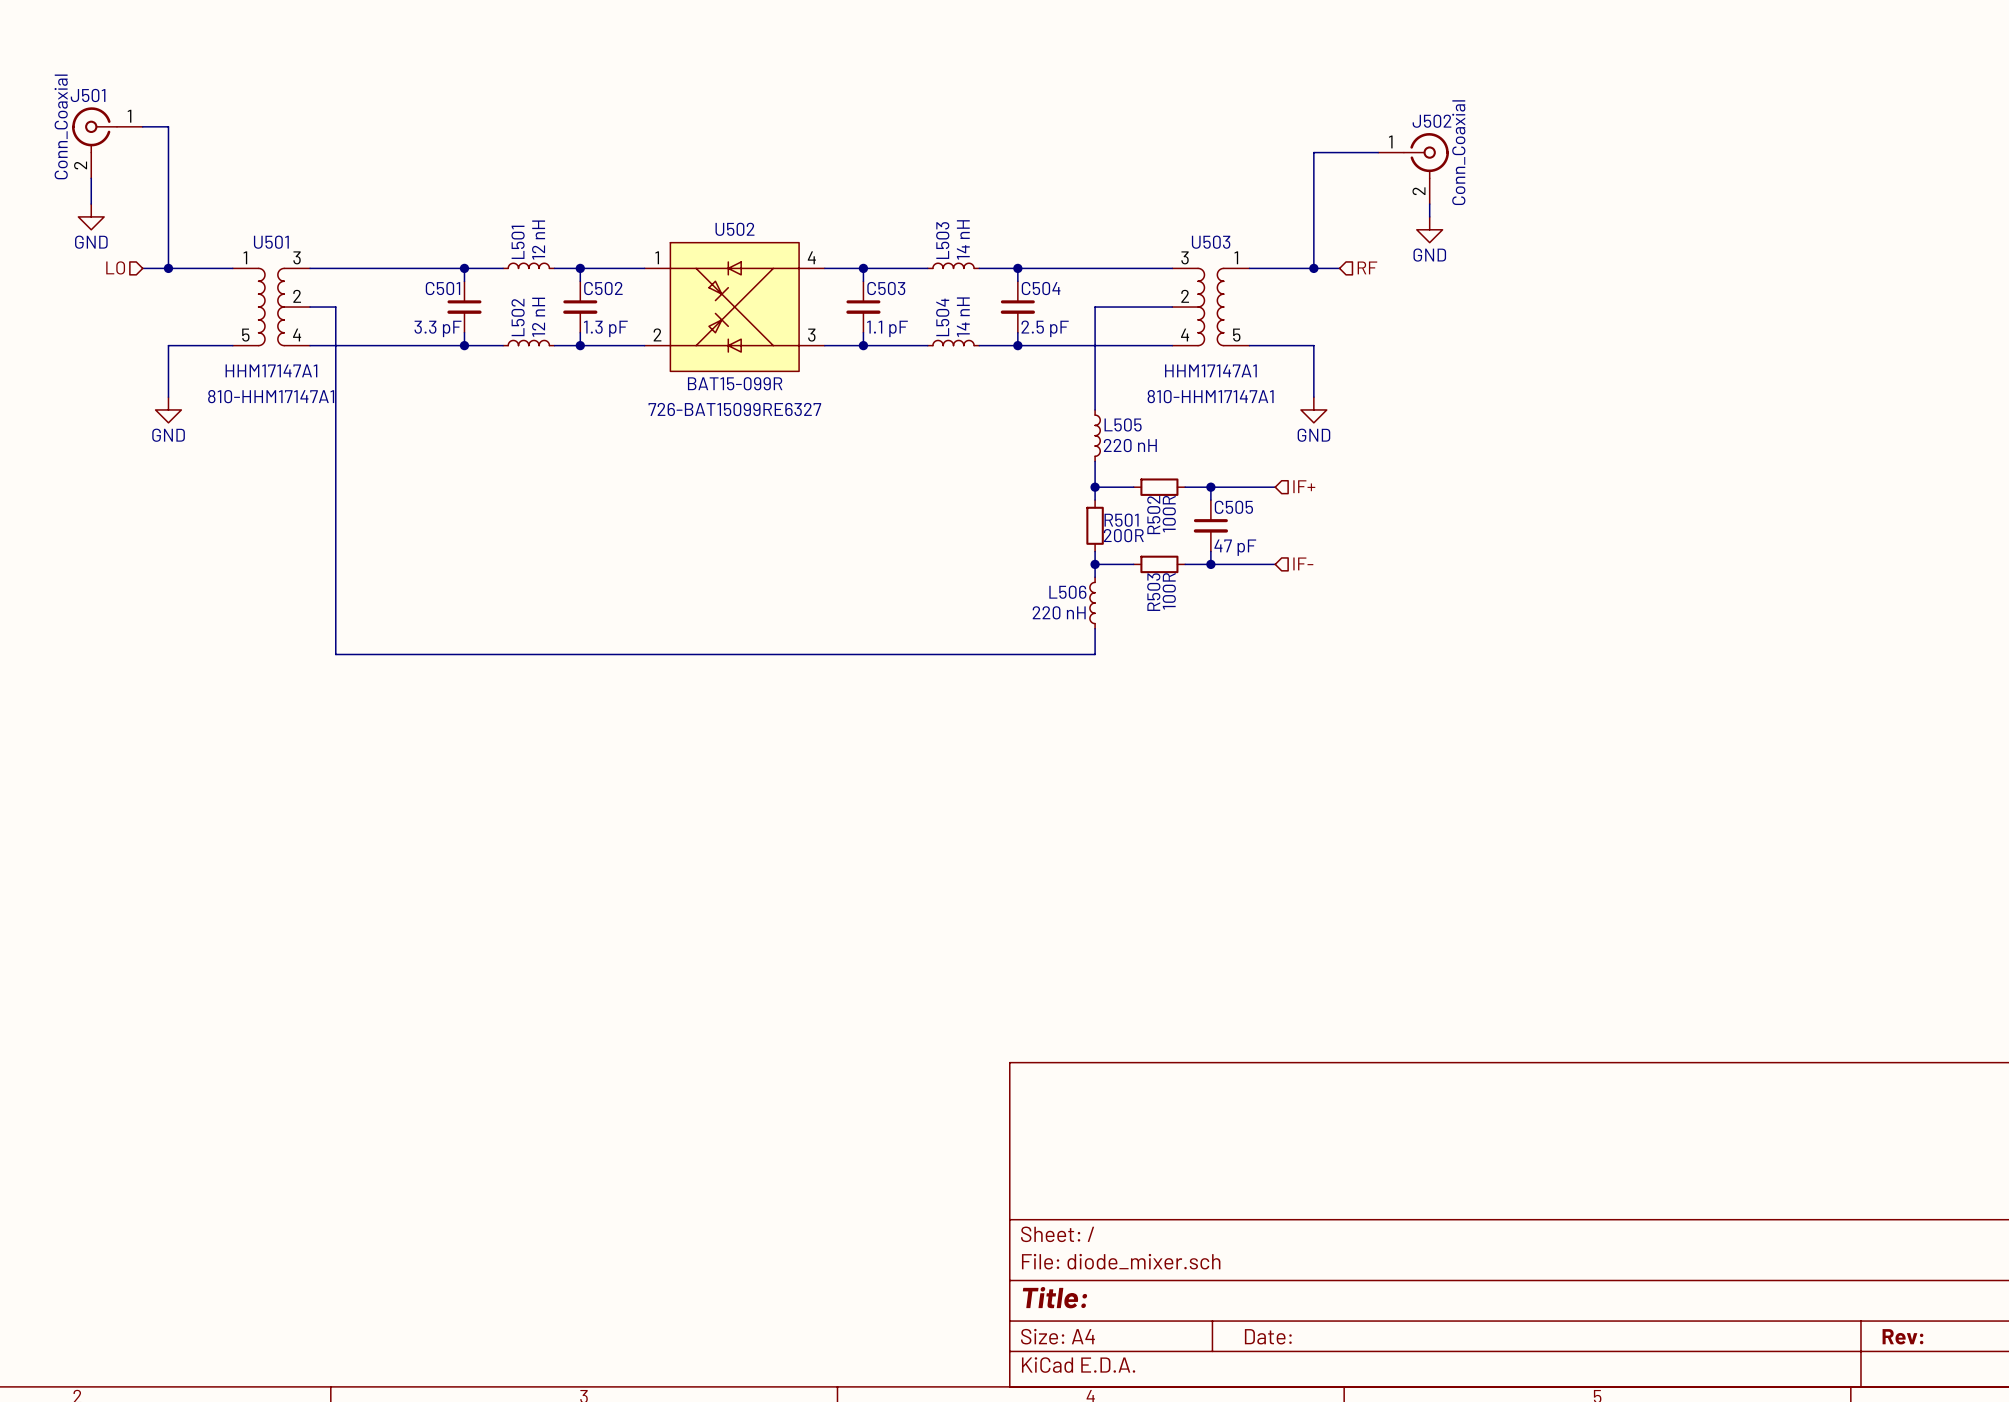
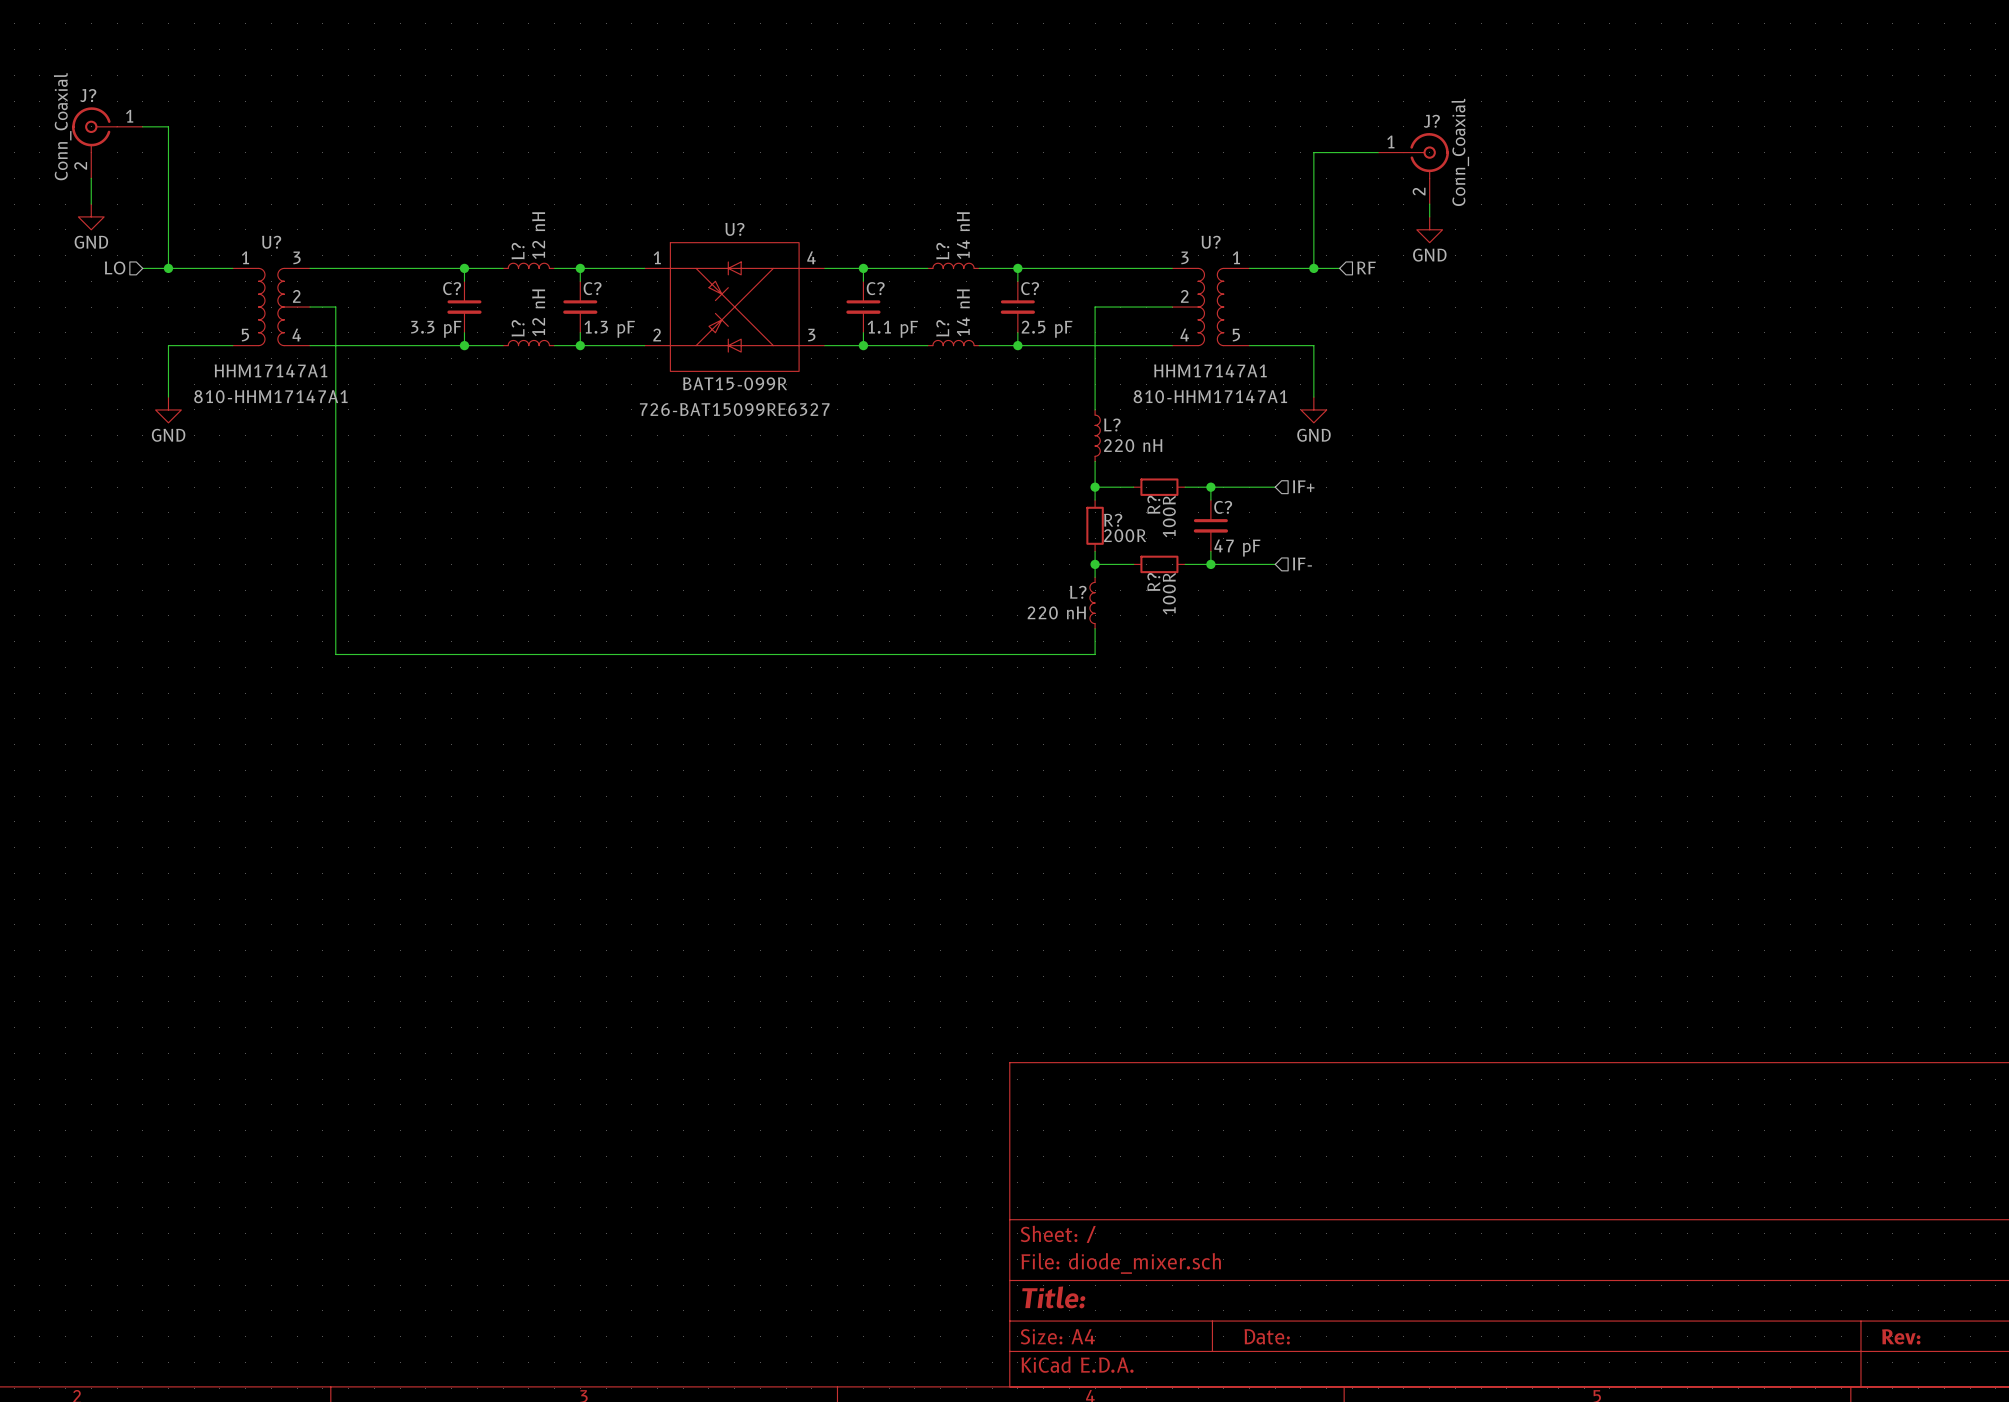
J501 name: J501 (88, 95) -> J? (88, 95)
J502 name: J502 (1431, 121) -> J? (1431, 121)
U502 name: U502 (734, 229) -> U? (734, 229)
L503 name: L503 (942, 240) -> L? (942, 251)
U501 name: U501 (271, 242) -> U? (271, 242)
L501 name: L501 (518, 242) -> L? (518, 251)
U503 name: U503 (1211, 242) -> U? (1211, 242)
C501 name: C501 (442, 288) -> C? (452, 288)
C502 name: C502 (603, 288) -> C? (592, 288)
C503 name: C503 (886, 288) -> C? (875, 288)
C504 name: C504 (1041, 288) -> C? (1030, 288)
L502 name: L502 (518, 317) -> L? (518, 328)
L504 name: L504 (942, 317) -> L? (942, 328)
L505 name: L505 (1123, 424) -> L? (1112, 424)
C505 name: C505 (1233, 507) -> C? (1223, 507)
R502 name: R502 (1153, 515) -> R? (1153, 504)
R501 name: R501 (1121, 520) -> R? (1113, 520)
L506 name: L506 (1067, 592) -> L? (1078, 592)
R503 name: R503 (1153, 592) -> R? (1153, 582)

